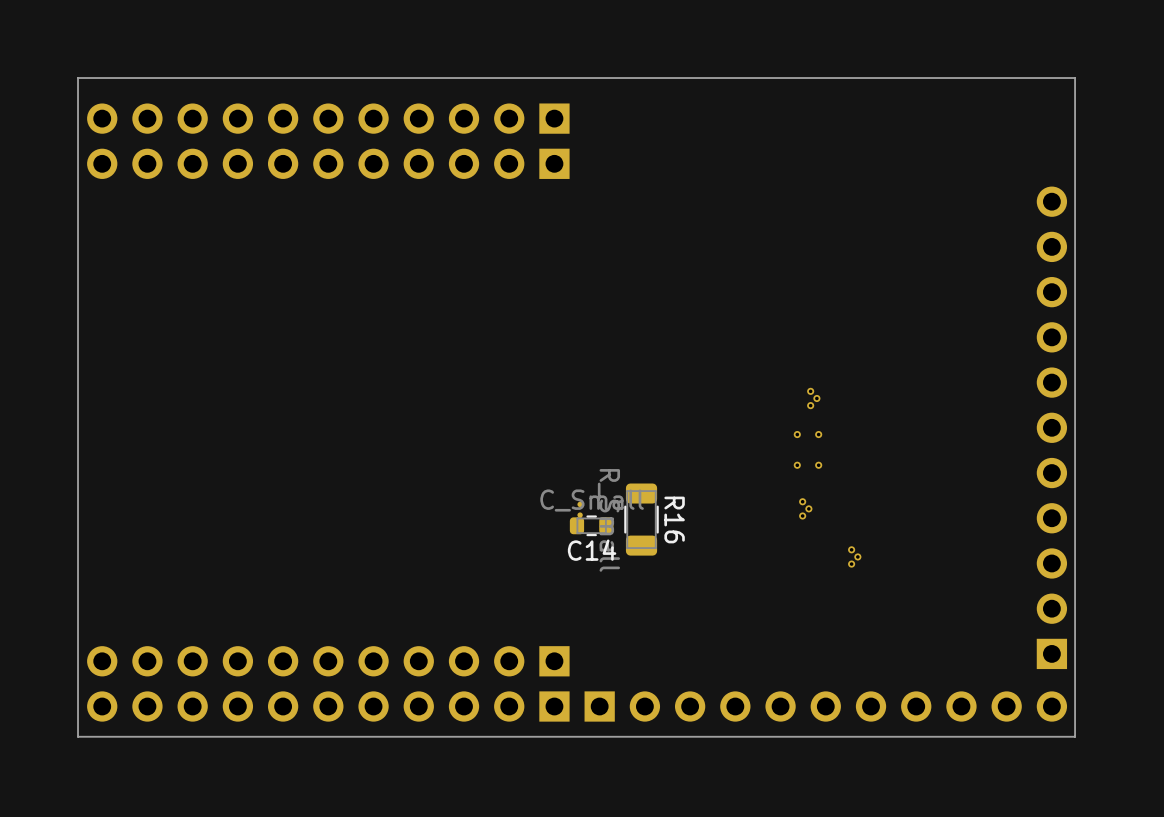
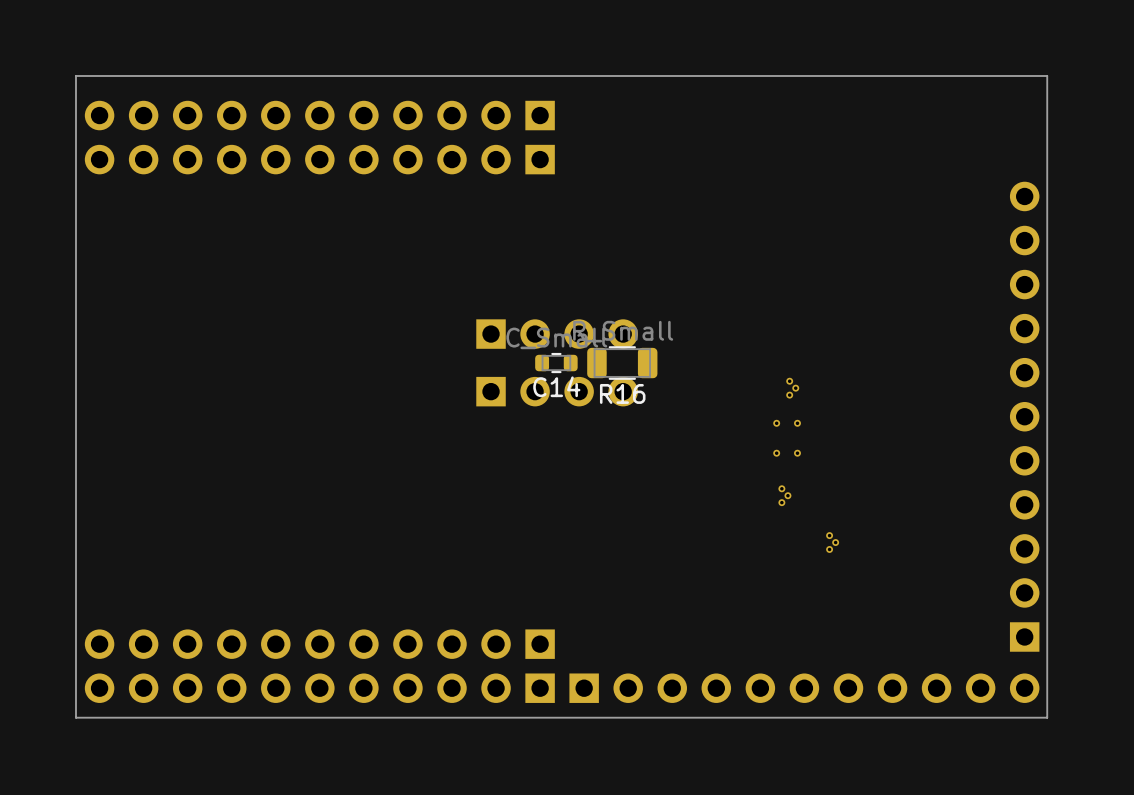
part: none -> (557, 334)
part: none -> (557, 391)
part: (580, 509) -> none
R16 rotation: 0° (641, 519) -> 90° clockwise (622, 363)
R16 position: (641, 519) -> (622, 363)
C14 position: (591, 525) -> (556, 363)

